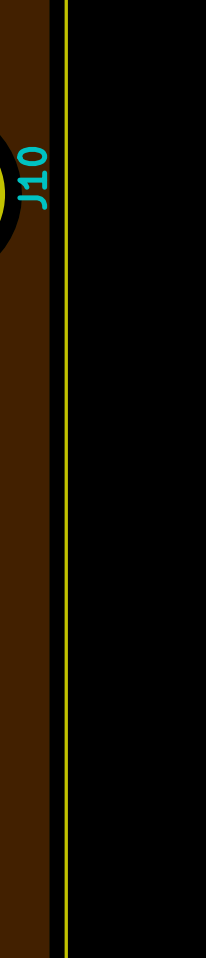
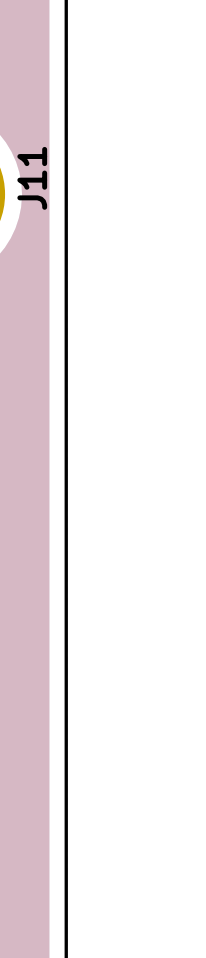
J10 name: J10 (32, 178) -> J11 (32, 178)

